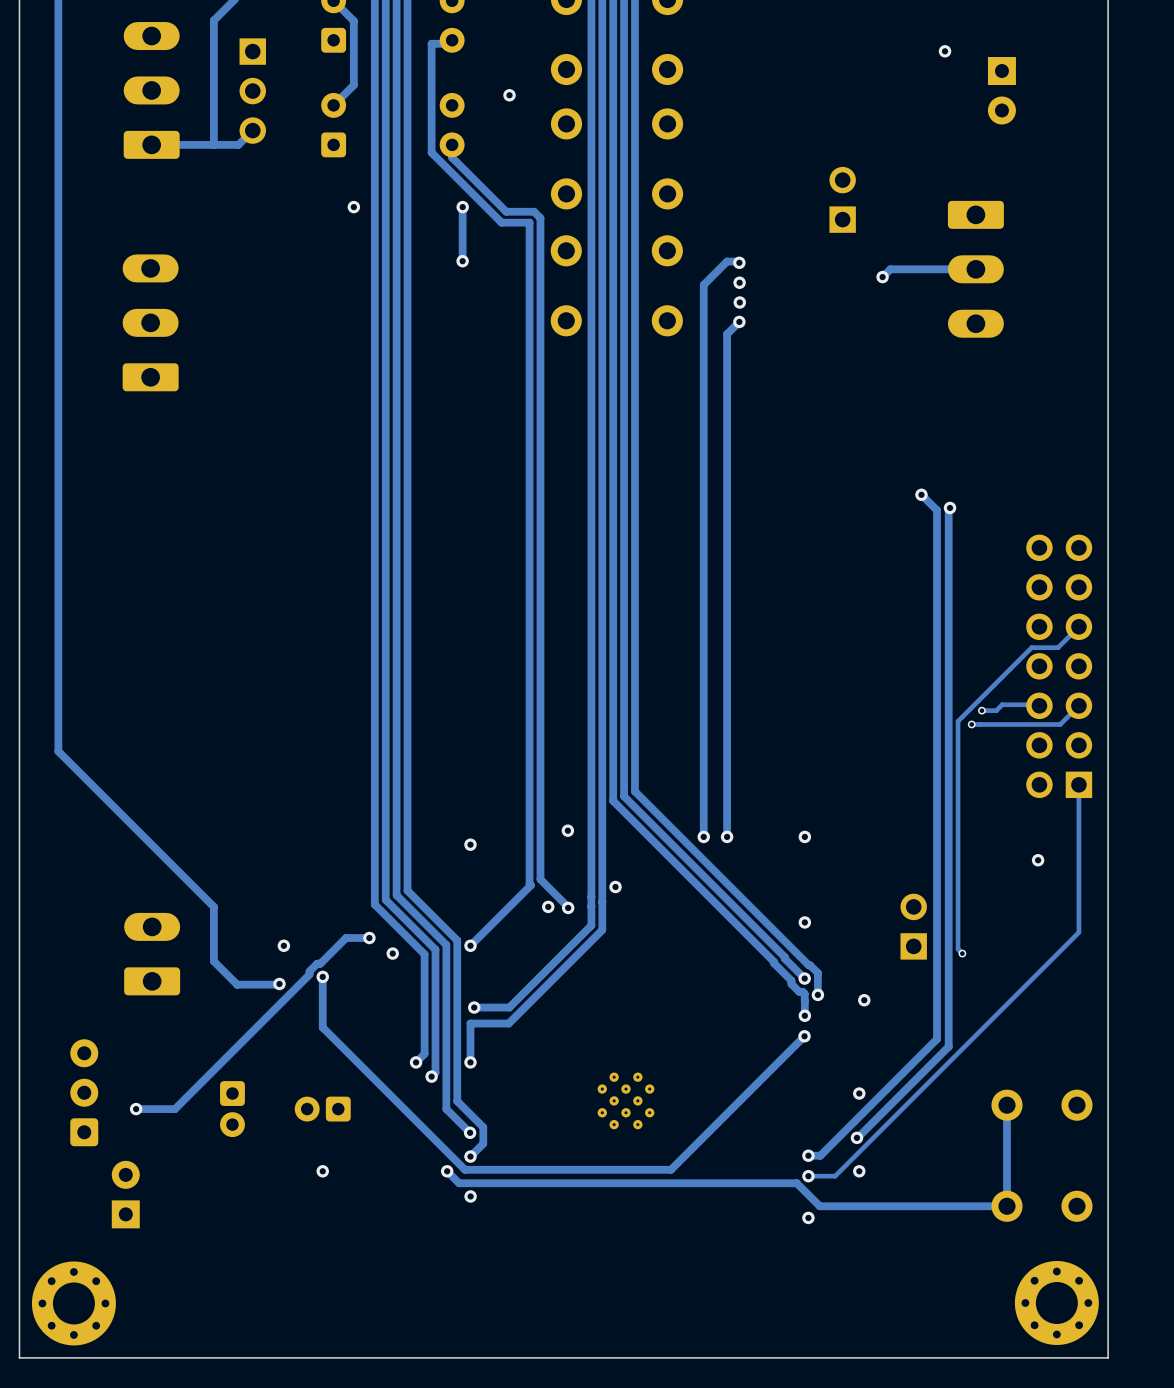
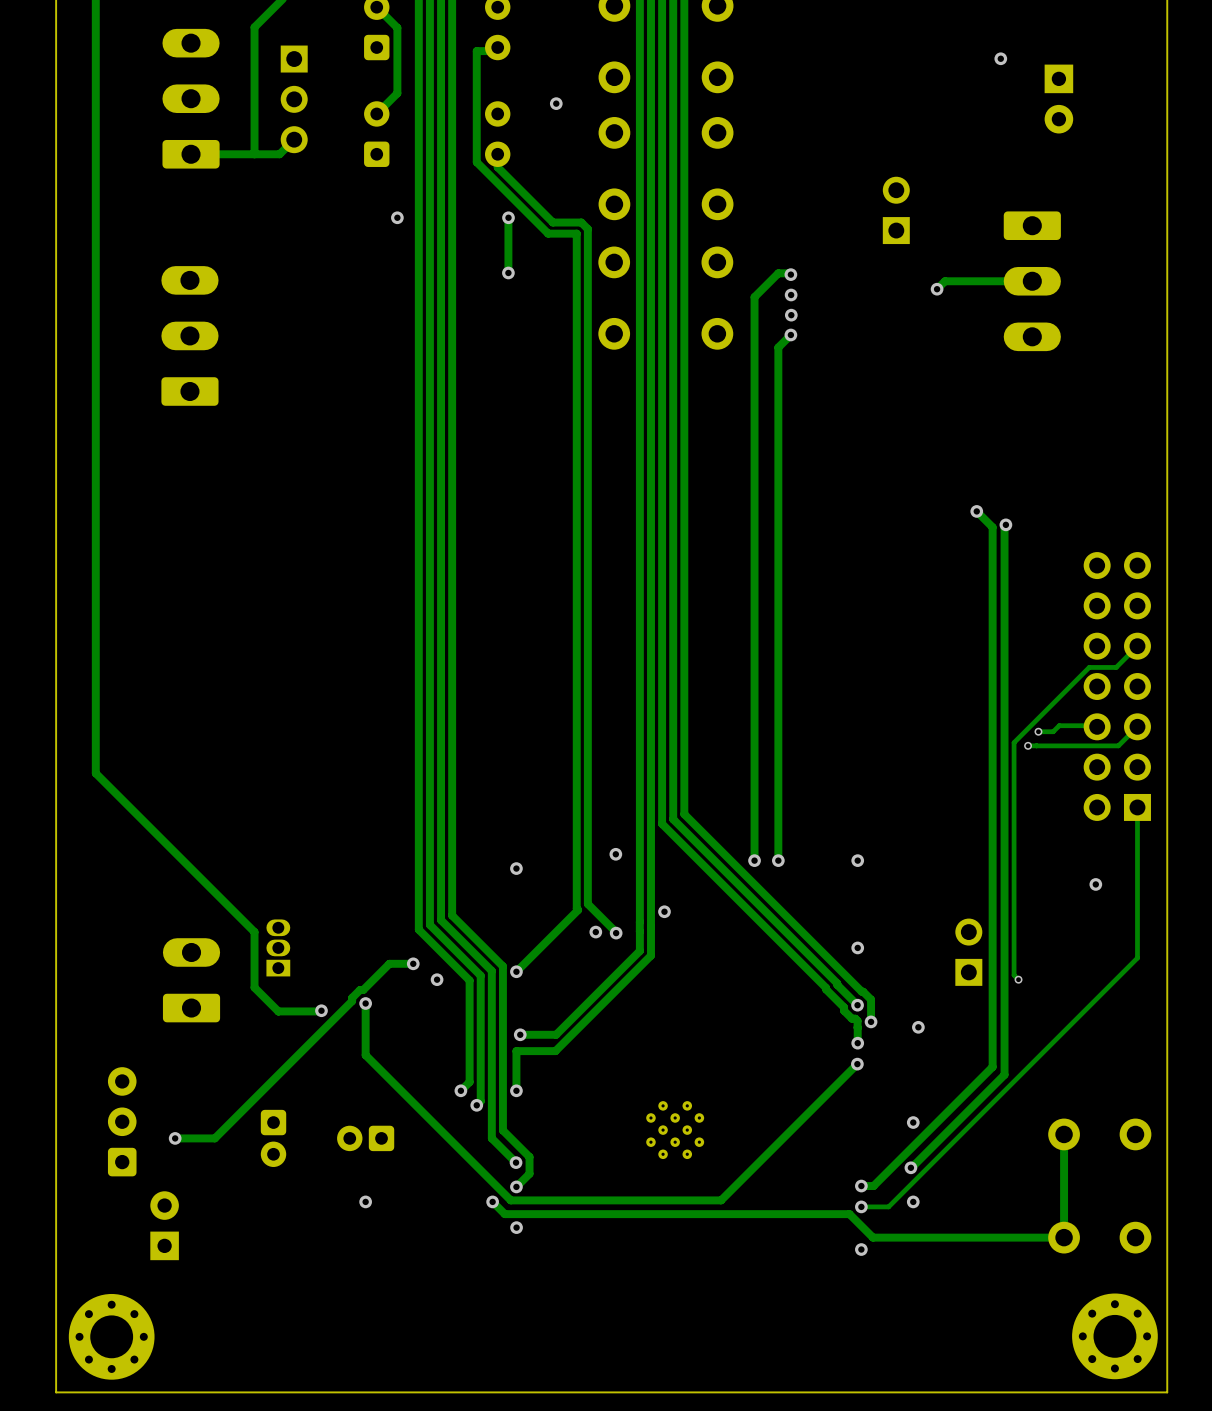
part: none -> (278, 947)
via: (283, 945) -> none

